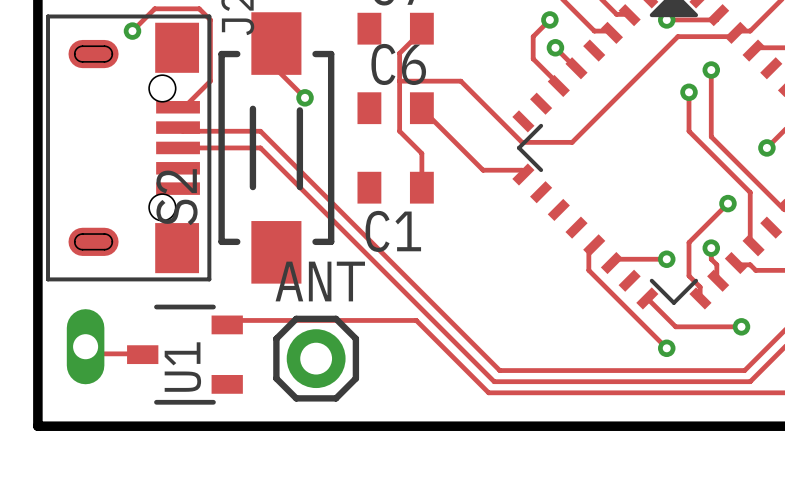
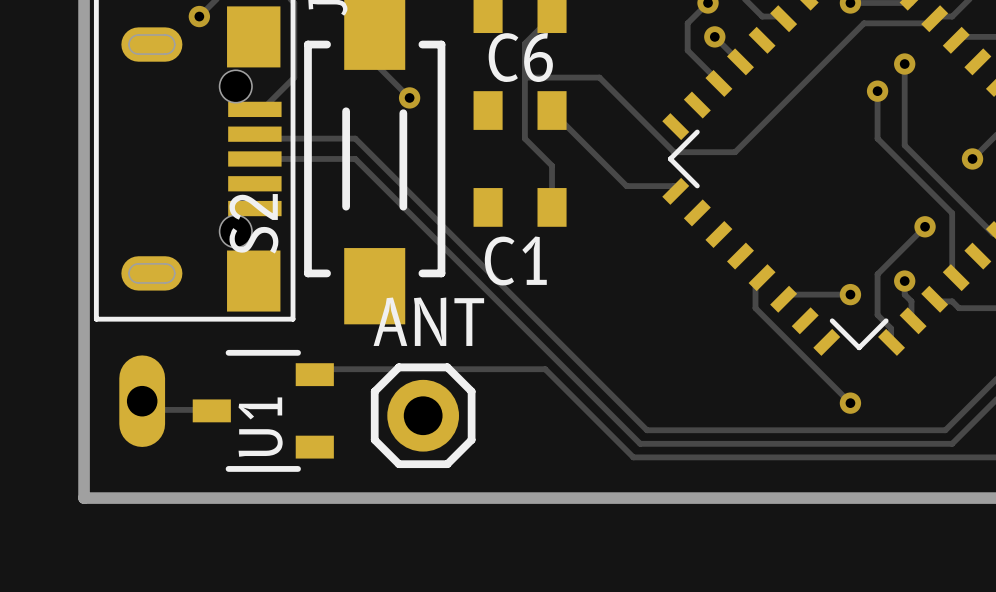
track: (647, 298) (675, 326) (741, 326) -> none
via: (741, 326) -> none

